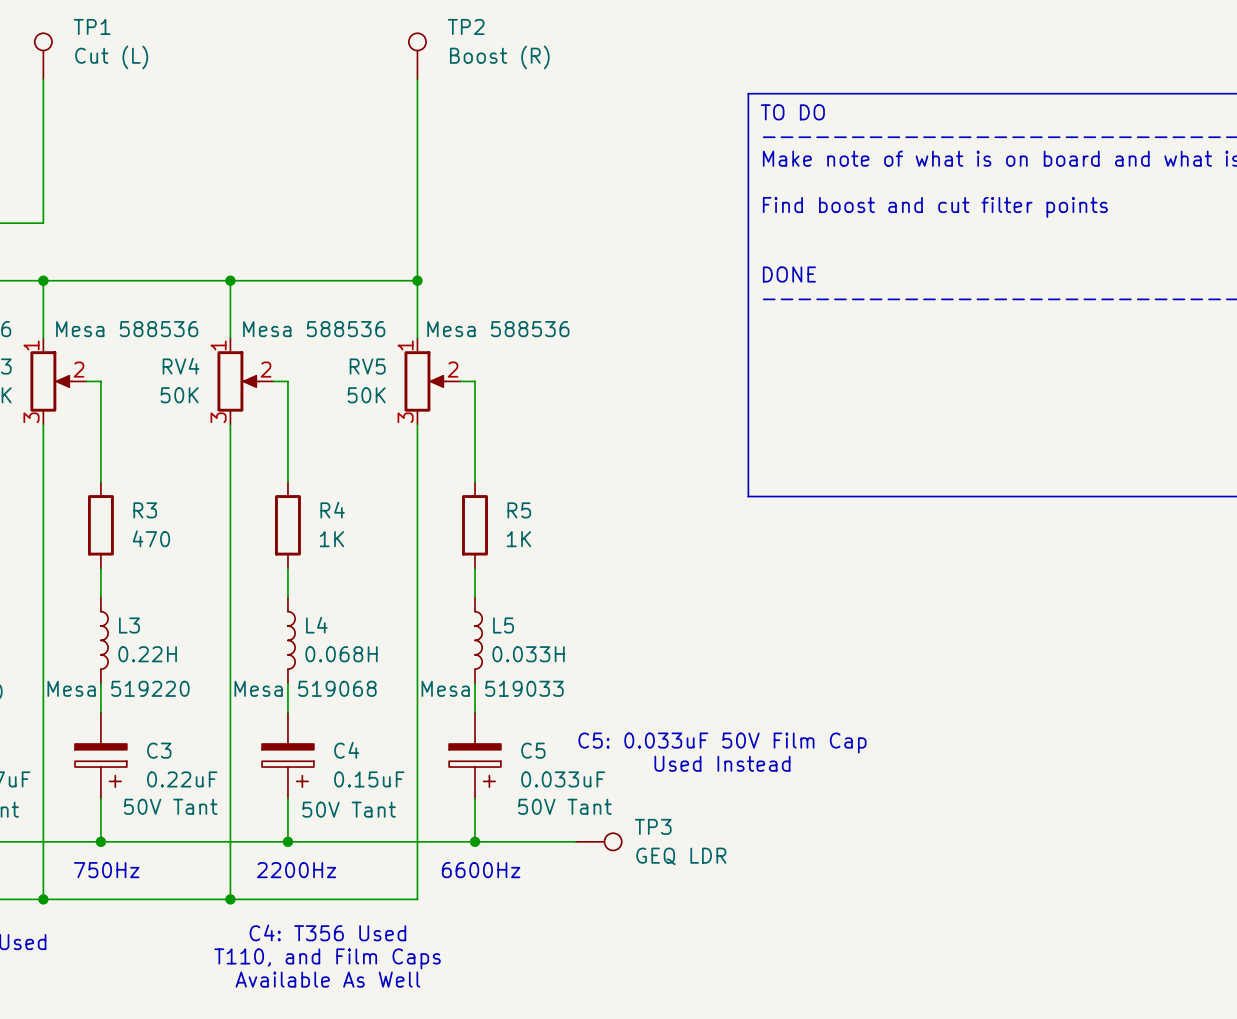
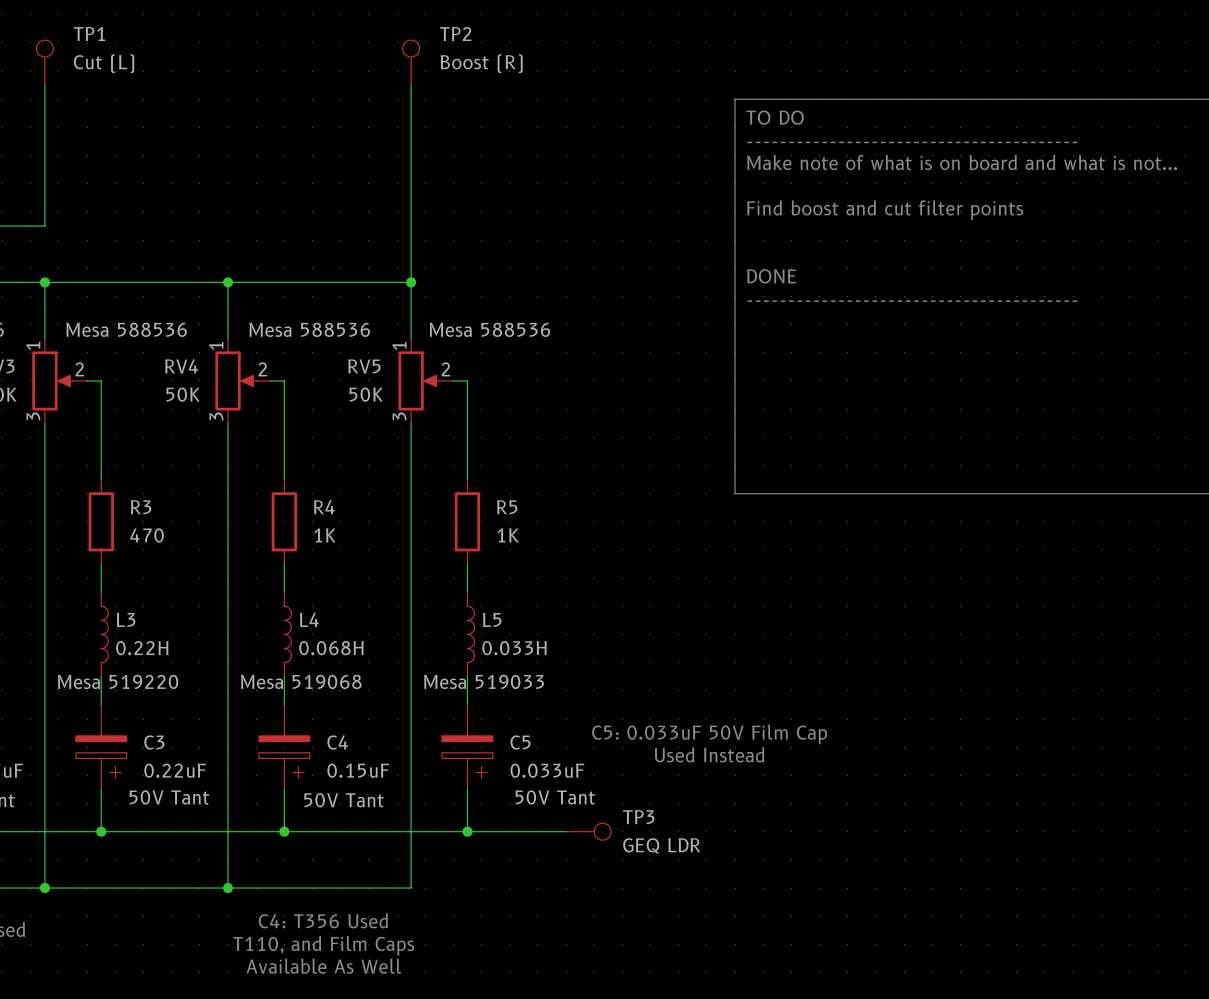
text: 750Hz (106, 870) -> none
text: 2200Hz (296, 870) -> none
text: 6600Hz (481, 870) -> none

